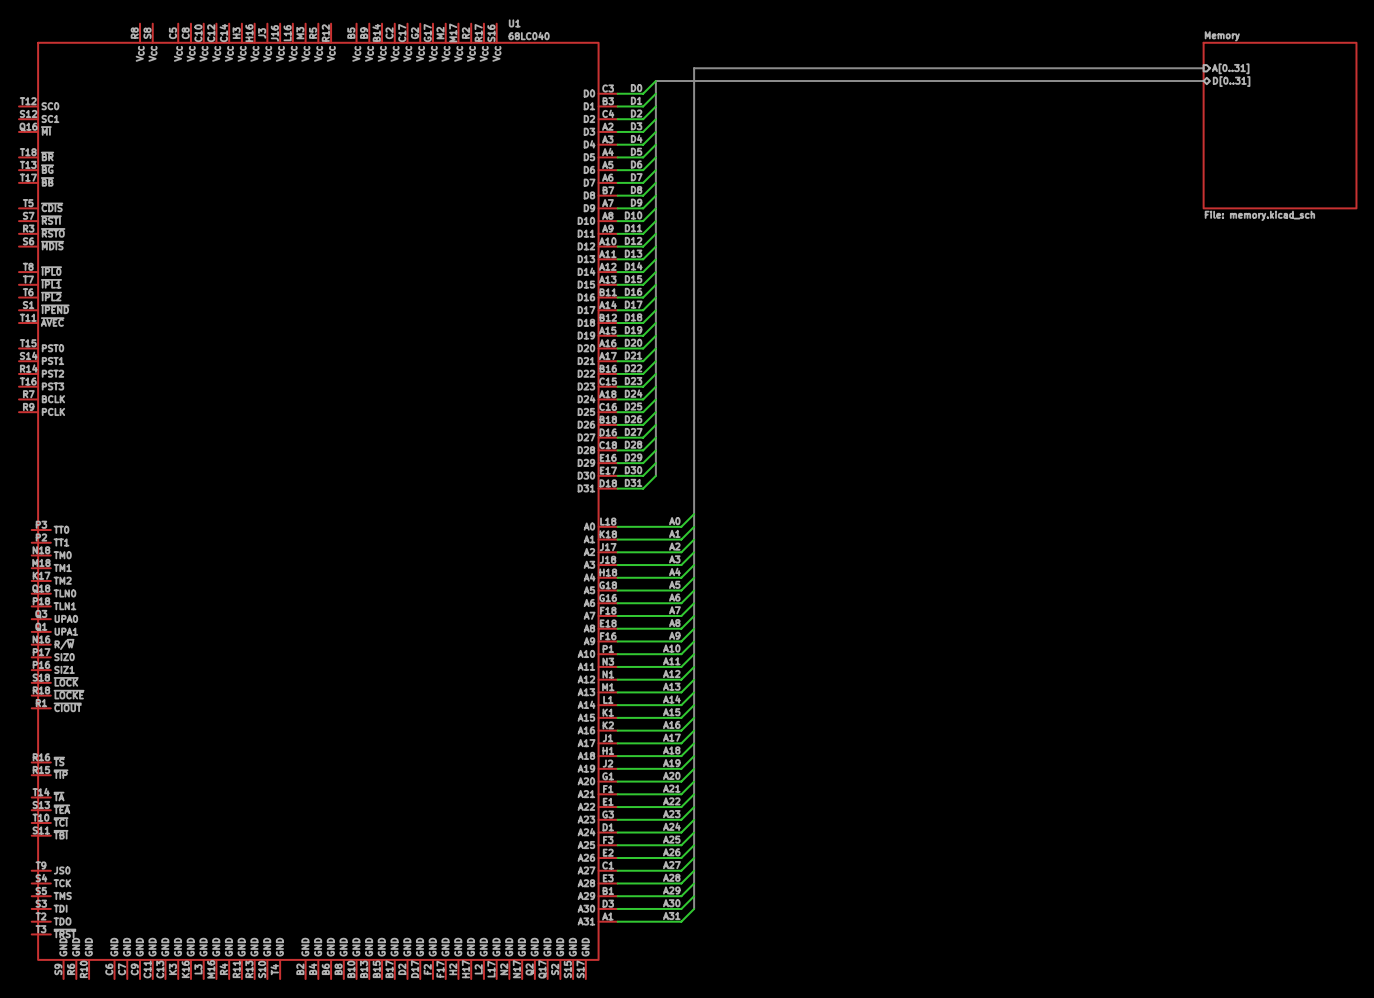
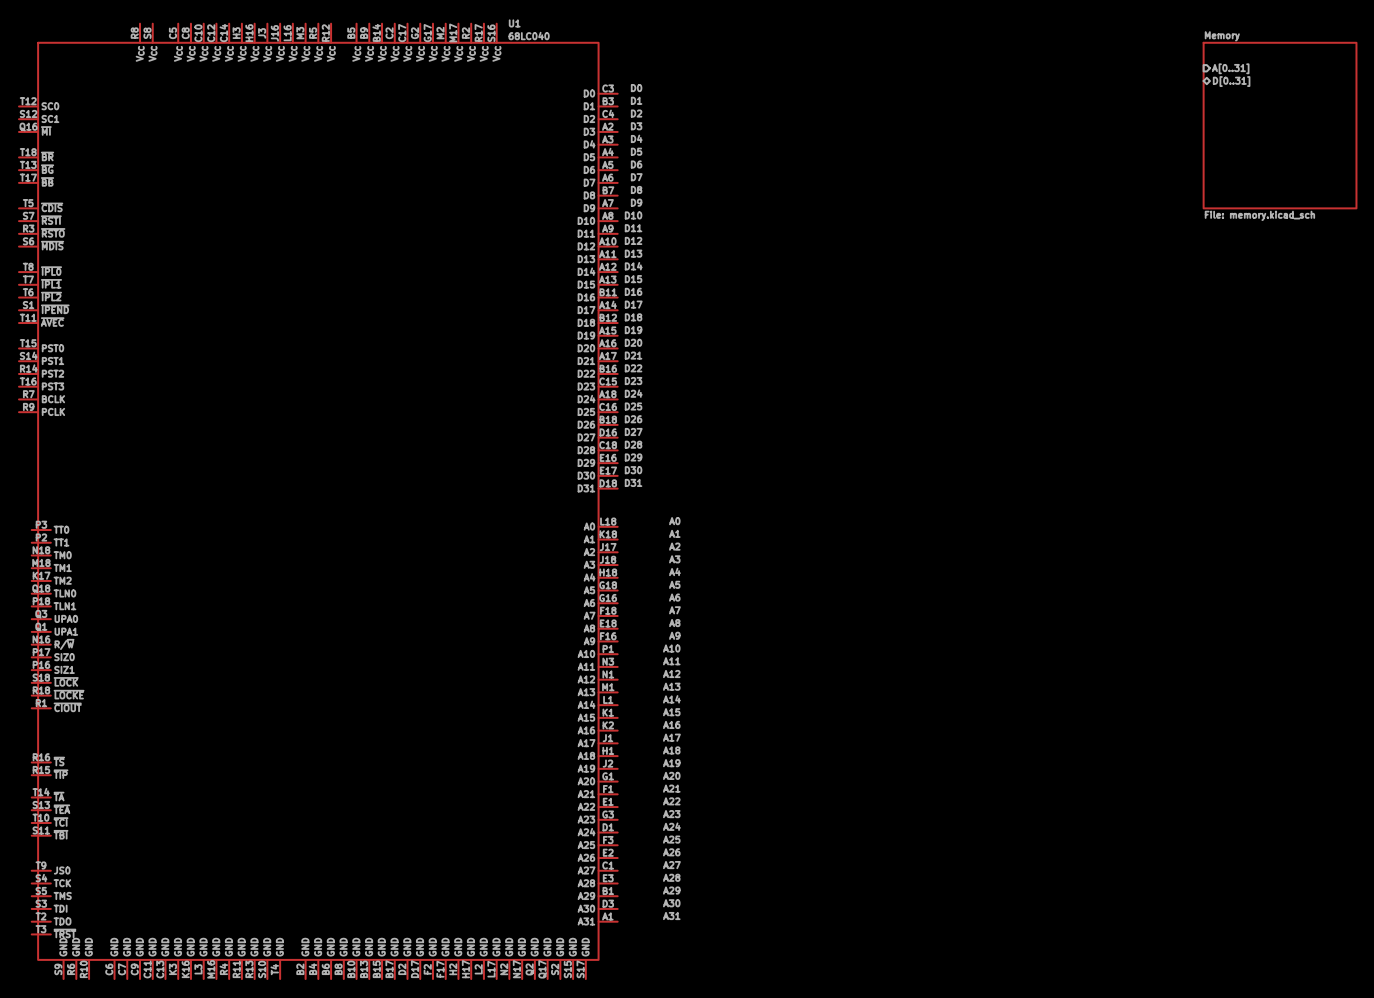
bus: (1203, 68) (694, 68) (694, 908) -> none
wire: (655, 81) (643, 93) (617, 93) -> none
bus: (1203, 81) (655, 81) (655, 475) -> none
wire: (655, 93) (643, 106) (617, 106) -> none
wire: (655, 106) (643, 119) (617, 119) -> none
wire: (655, 119) (643, 131) (617, 131) -> none
wire: (655, 131) (643, 144) (617, 144) -> none
wire: (655, 144) (643, 157) (617, 157) -> none
wire: (655, 157) (643, 170) (617, 170) -> none
wire: (655, 170) (643, 182) (617, 182) -> none
wire: (655, 182) (643, 195) (617, 195) -> none
wire: (655, 195) (643, 208) (617, 208) -> none
wire: (655, 208) (643, 221) (617, 221) -> none
wire: (655, 221) (643, 233) (617, 233) -> none
wire: (655, 233) (643, 246) (617, 246) -> none
wire: (655, 246) (643, 259) (617, 259) -> none
wire: (655, 259) (643, 272) (617, 272) -> none
wire: (655, 272) (643, 284) (617, 284) -> none
wire: (655, 284) (643, 297) (617, 297) -> none
wire: (655, 297) (643, 310) (617, 310) -> none
wire: (655, 310) (643, 323) (617, 323) -> none
wire: (655, 323) (643, 335) (617, 335) -> none
wire: (655, 335) (643, 348) (617, 348) -> none
wire: (655, 348) (643, 361) (617, 361) -> none
wire: (655, 361) (643, 373) (617, 373) -> none
wire: (655, 373) (643, 386) (617, 386) -> none
wire: (655, 386) (643, 399) (617, 399) -> none
wire: (655, 399) (643, 412) (617, 412) -> none
wire: (655, 412) (643, 424) (617, 424) -> none
wire: (655, 424) (643, 437) (617, 437) -> none
wire: (655, 437) (643, 450) (617, 450) -> none
wire: (655, 450) (643, 463) (617, 463) -> none
wire: (655, 463) (643, 475) (617, 475) -> none
wire: (655, 475) (643, 488) (617, 488) -> none
wire: (694, 514) (681, 526) (617, 526) -> none
wire: (694, 526) (681, 539) (617, 539) -> none
wire: (694, 539) (681, 552) (617, 552) -> none
wire: (694, 552) (681, 565) (617, 565) -> none
wire: (694, 565) (681, 577) (617, 577) -> none
wire: (694, 577) (681, 590) (617, 590) -> none
wire: (694, 590) (681, 603) (617, 603) -> none
wire: (694, 603) (681, 615) (617, 615) -> none
wire: (694, 615) (681, 628) (617, 628) -> none
wire: (694, 628) (681, 641) (617, 641) -> none
wire: (694, 641) (681, 654) (617, 654) -> none
wire: (694, 654) (681, 666) (617, 666) -> none
wire: (694, 666) (681, 679) (617, 679) -> none
wire: (694, 679) (681, 692) (617, 692) -> none
wire: (694, 692) (681, 705) (617, 705) -> none
wire: (694, 705) (681, 717) (617, 717) -> none
wire: (694, 717) (681, 730) (617, 730) -> none
wire: (694, 730) (681, 743) (617, 743) -> none
wire: (694, 743) (681, 756) (617, 756) -> none
wire: (694, 756) (681, 768) (617, 768) -> none
wire: (694, 768) (681, 781) (617, 781) -> none
wire: (694, 781) (681, 794) (617, 794) -> none
wire: (694, 794) (681, 807) (617, 807) -> none
wire: (694, 807) (681, 819) (617, 819) -> none
wire: (694, 819) (681, 832) (617, 832) -> none
wire: (694, 832) (681, 845) (617, 845) -> none
wire: (694, 845) (681, 858) (617, 858) -> none
wire: (694, 858) (681, 870) (617, 870) -> none
wire: (694, 870) (681, 883) (617, 883) -> none
wire: (694, 883) (681, 896) (617, 896) -> none
wire: (694, 896) (681, 908) (617, 908) -> none
wire: (694, 908) (681, 921) (617, 921) -> none

